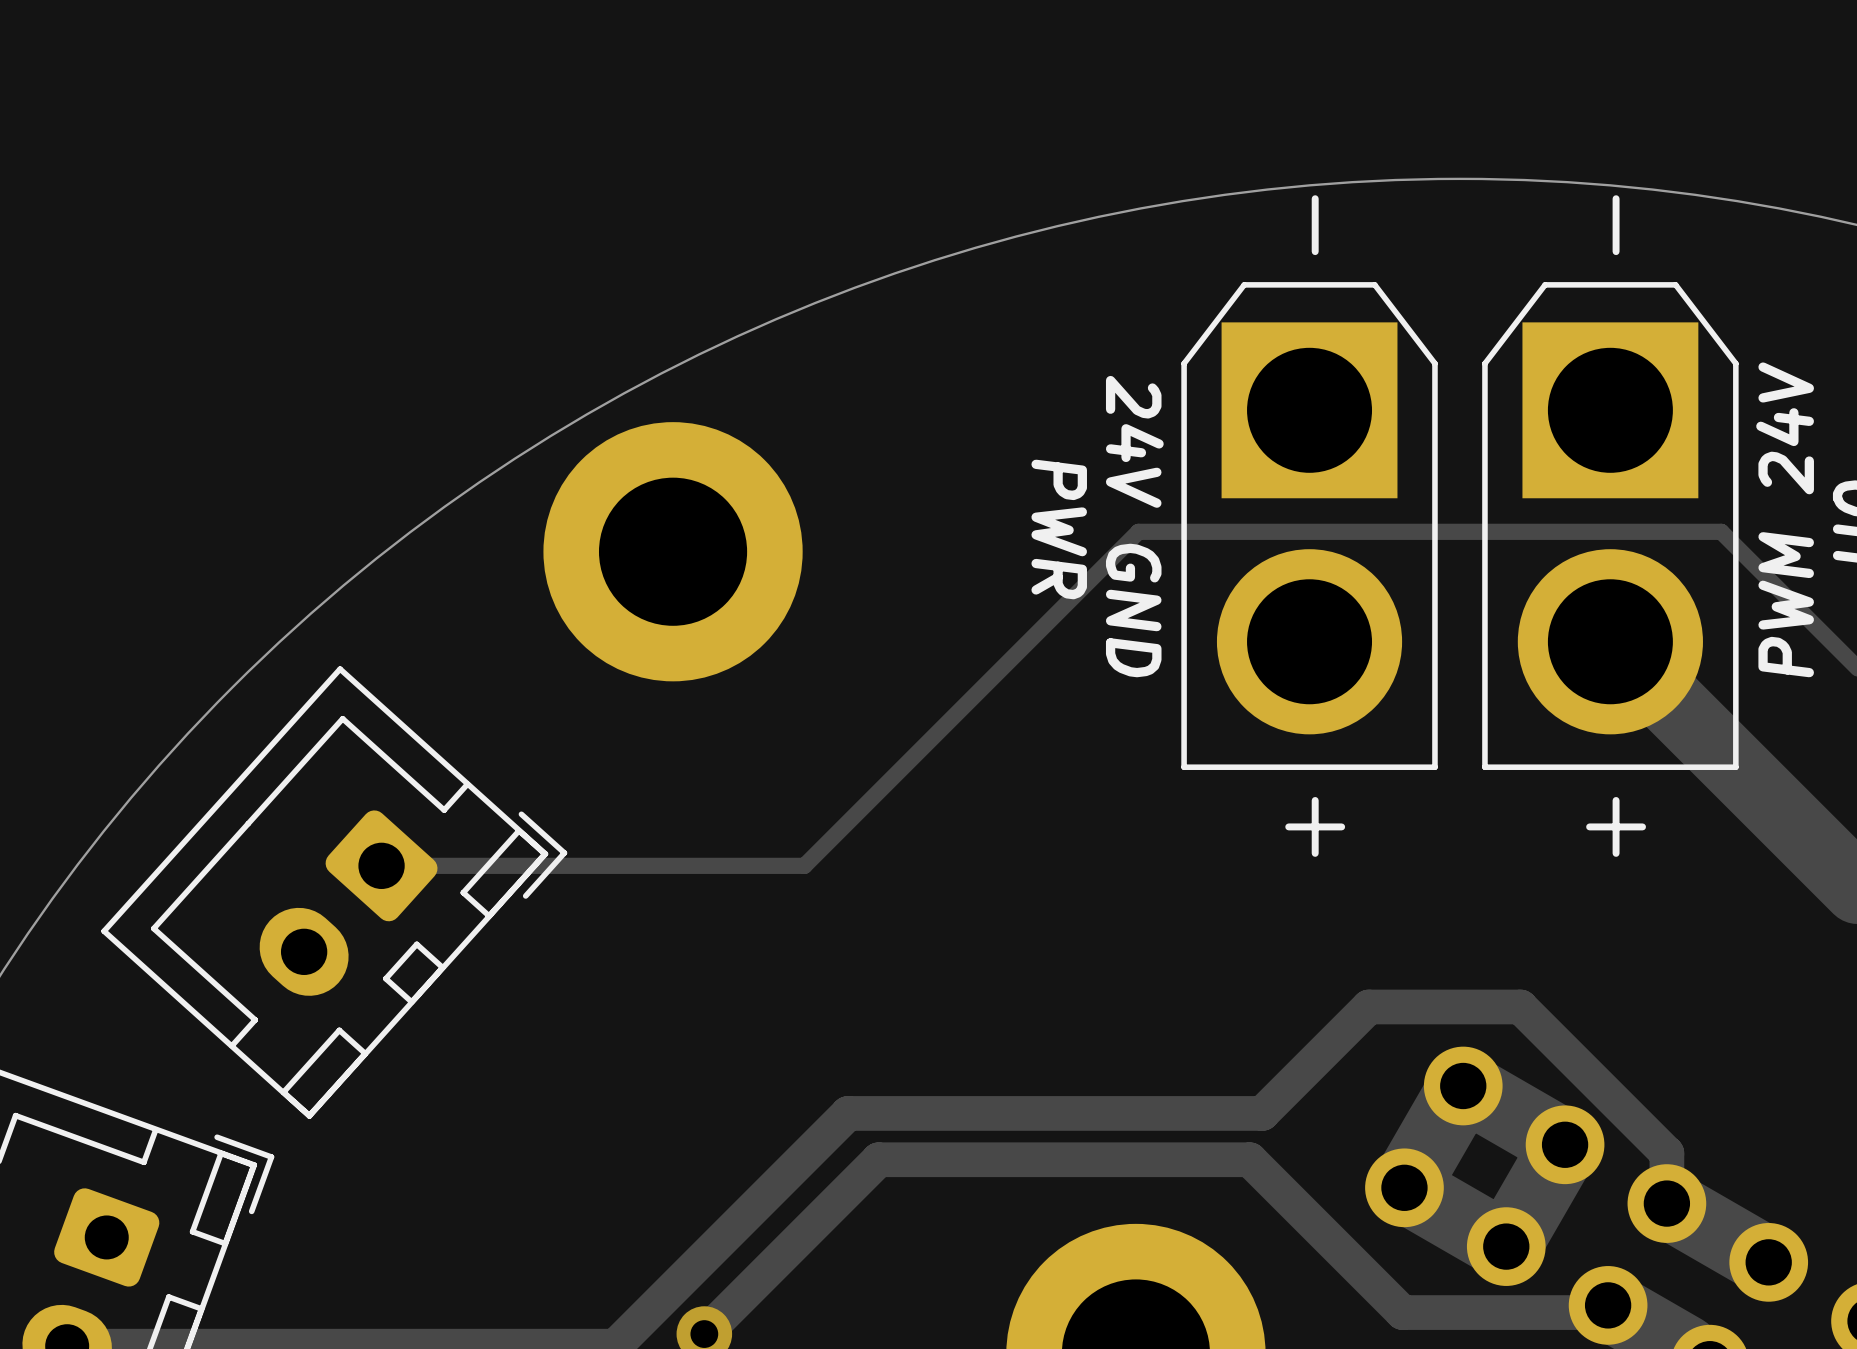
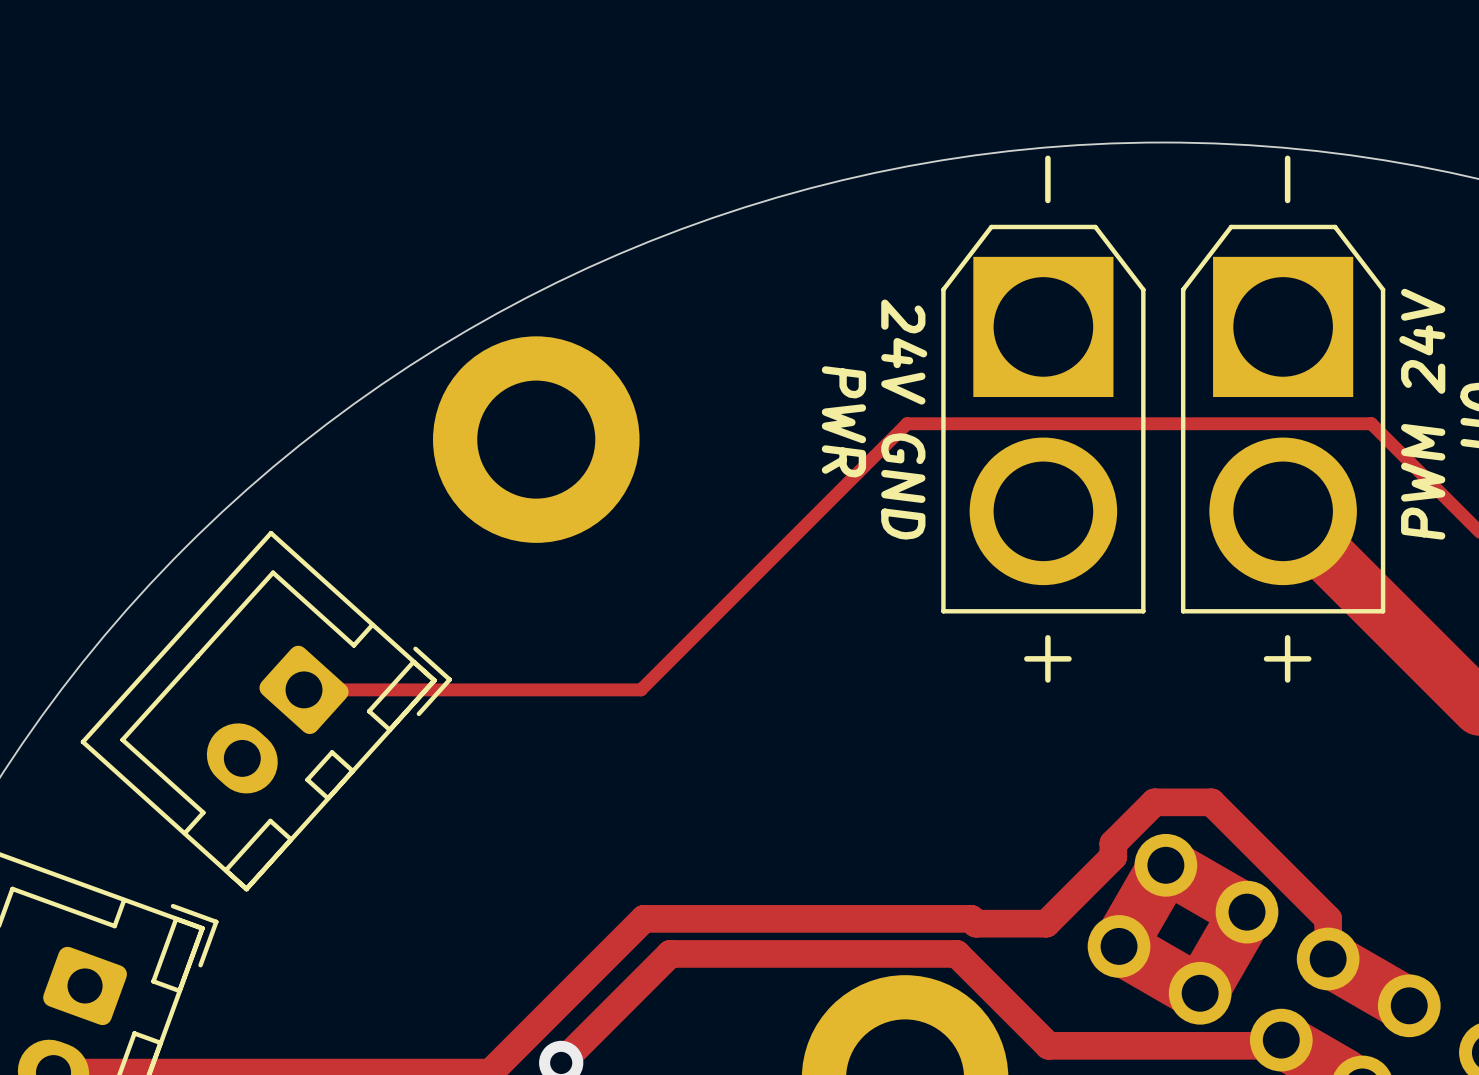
track: (1448, 1006) (1368, 1006) (1262, 1113) (848, 1113) (808, 1153) -> (1154, 802) (1113, 843) (1113, 856) (1046, 923) (976, 923) (971, 918) (643, 918)
track: (841, 1197) (878, 1159) (1249, 1159) (1402, 1312) -> (670, 953) (956, 953) (1048, 1045) (1117, 1045)

